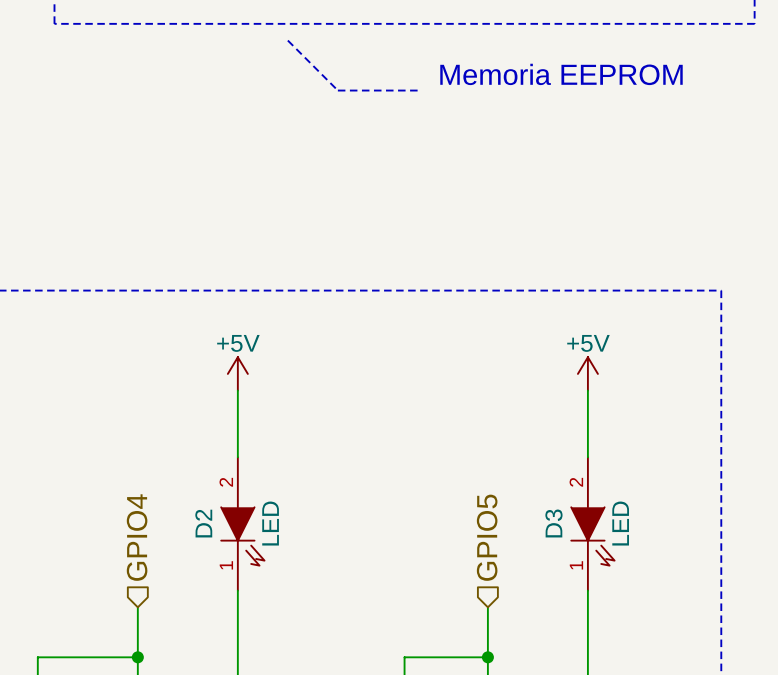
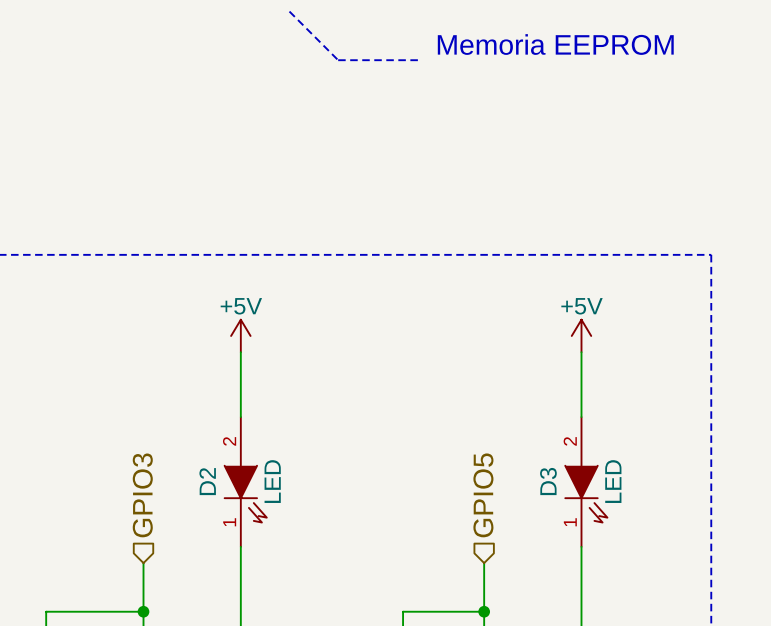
hierarchical label: GPIO4 (137, 537) -> GPIO3 (142, 495)

